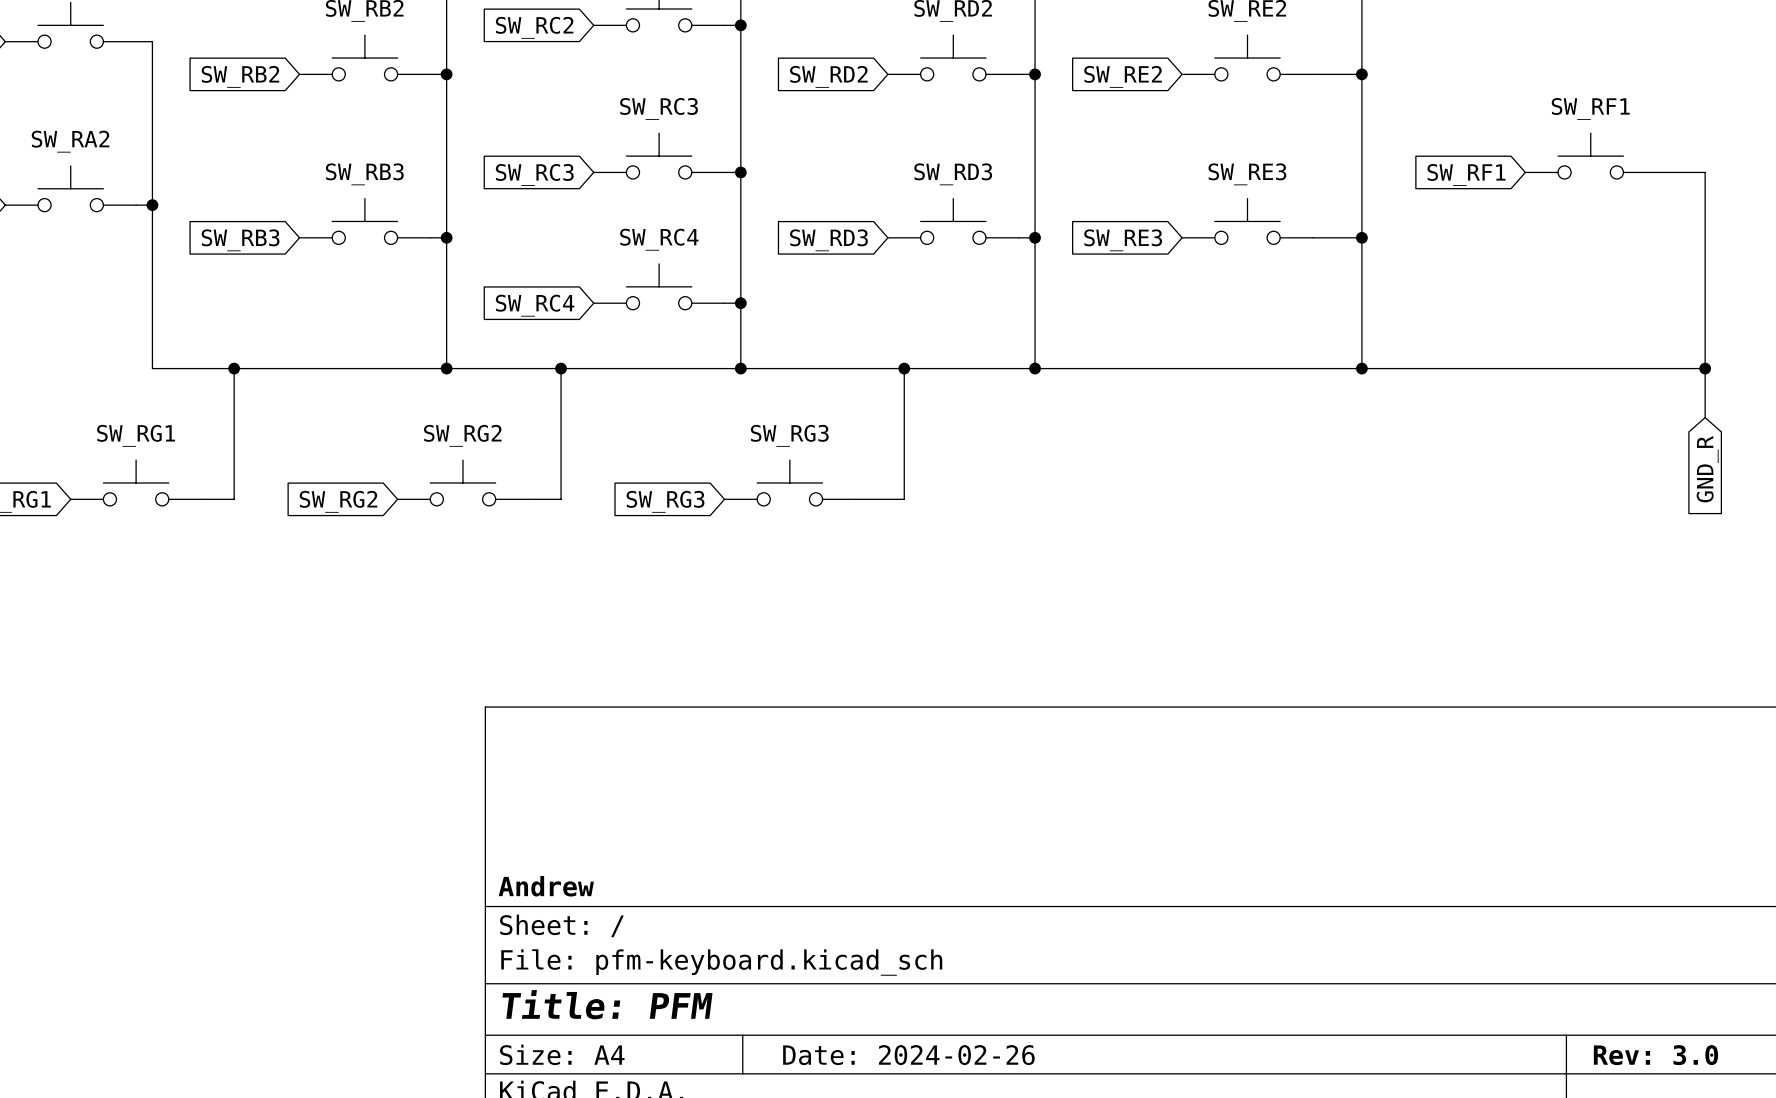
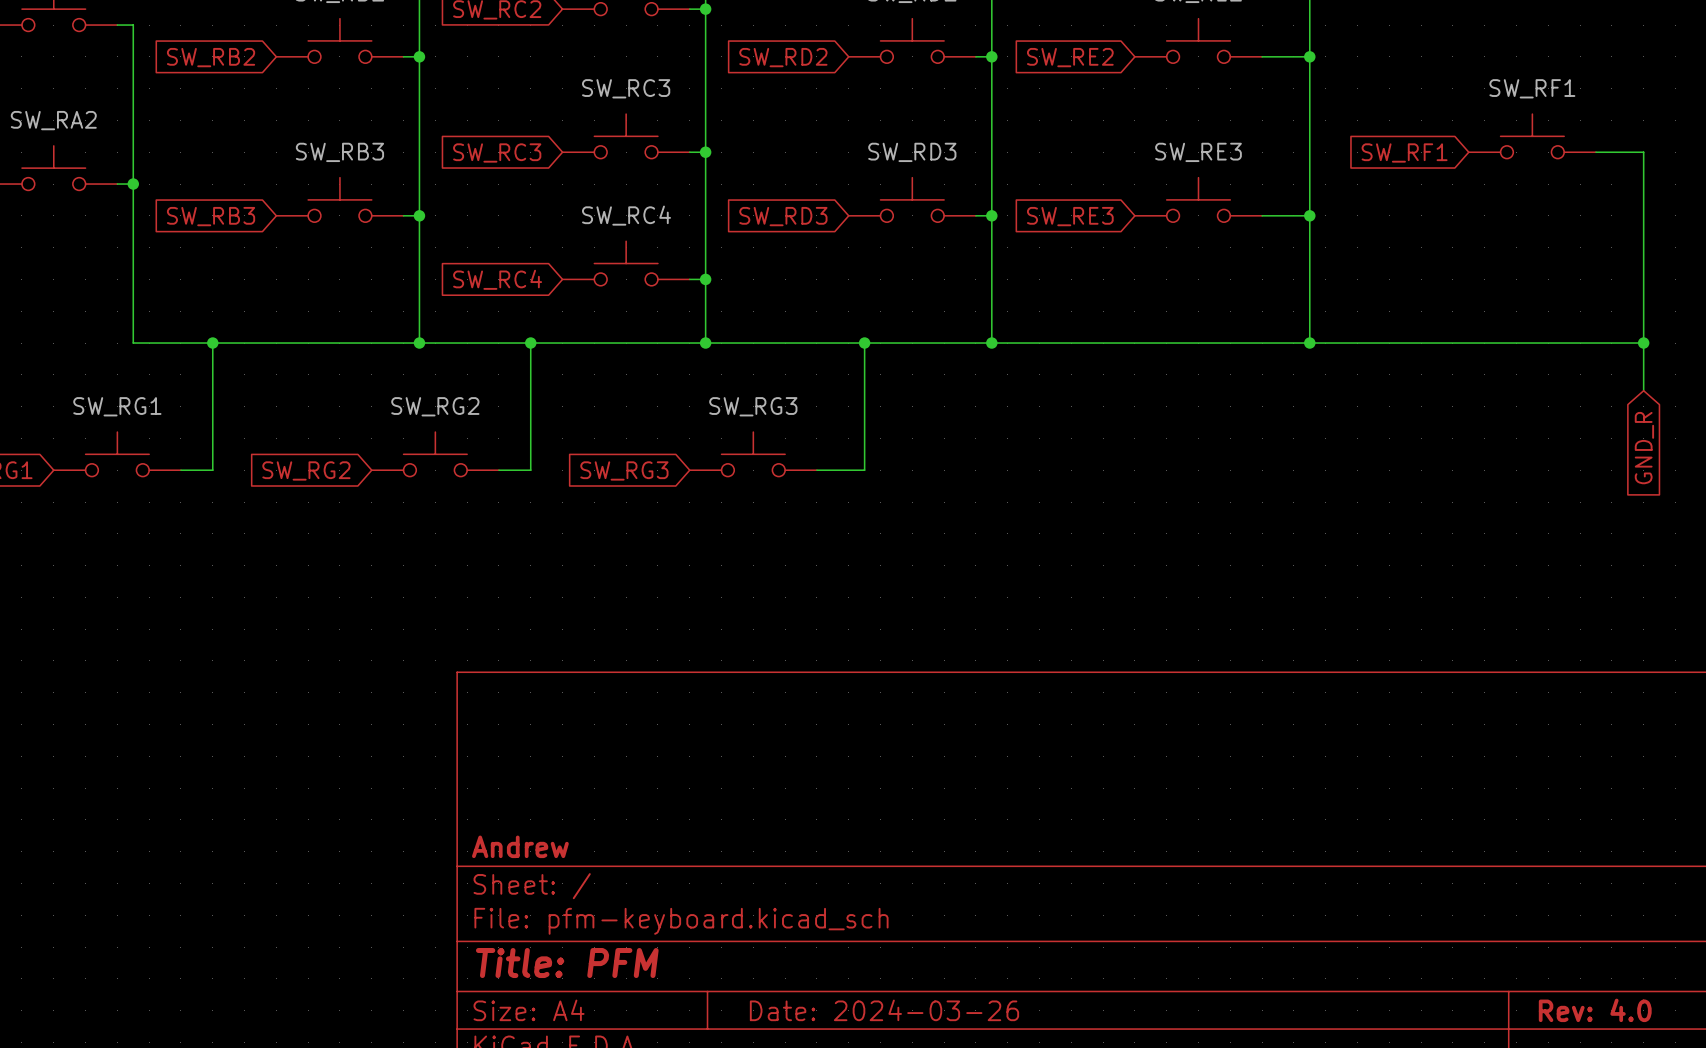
title block: Date: 2024-02-26 (908, 1055) -> Date: 2024-03-26 (884, 1010)
title block: Rev: 3.0 (1655, 1055) -> Rev: 4.0 (1595, 1010)

